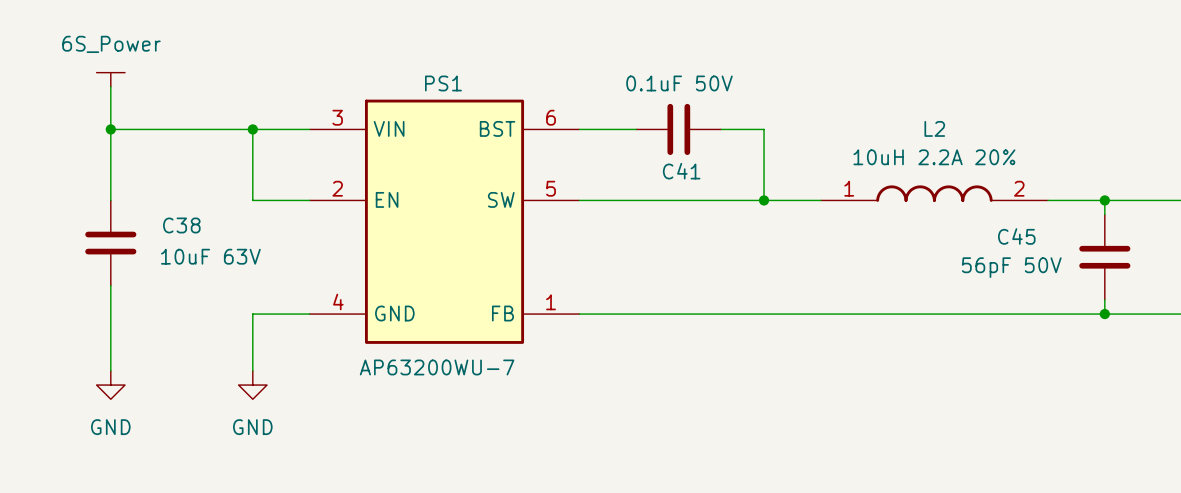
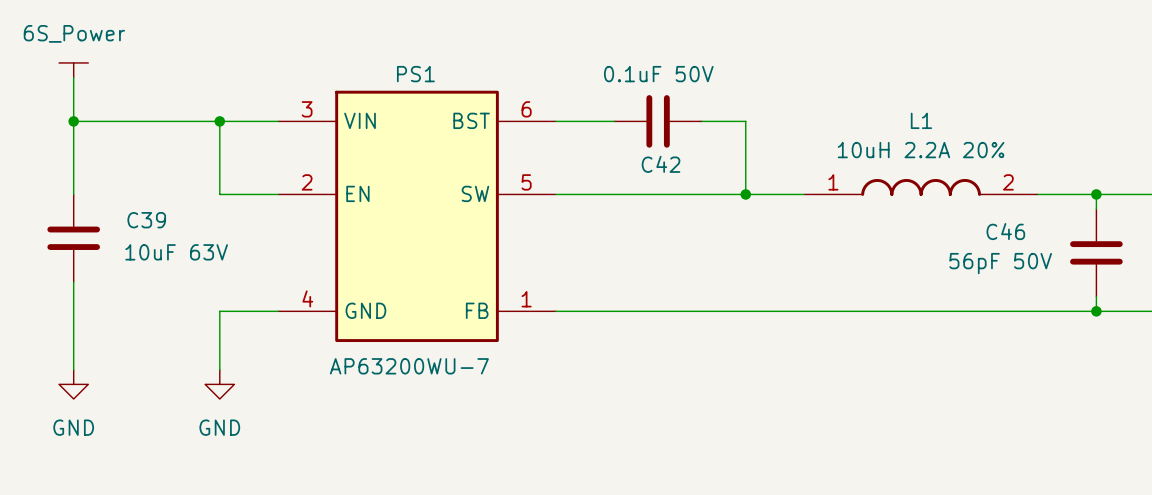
L2 name: L2 (934, 128) -> L1 (921, 120)
C41 name: C41 (681, 171) -> C42 (661, 164)
C38 name: C38 (181, 225) -> C39 (146, 220)
C45 name: C45 (1016, 236) -> C46 (1005, 231)

